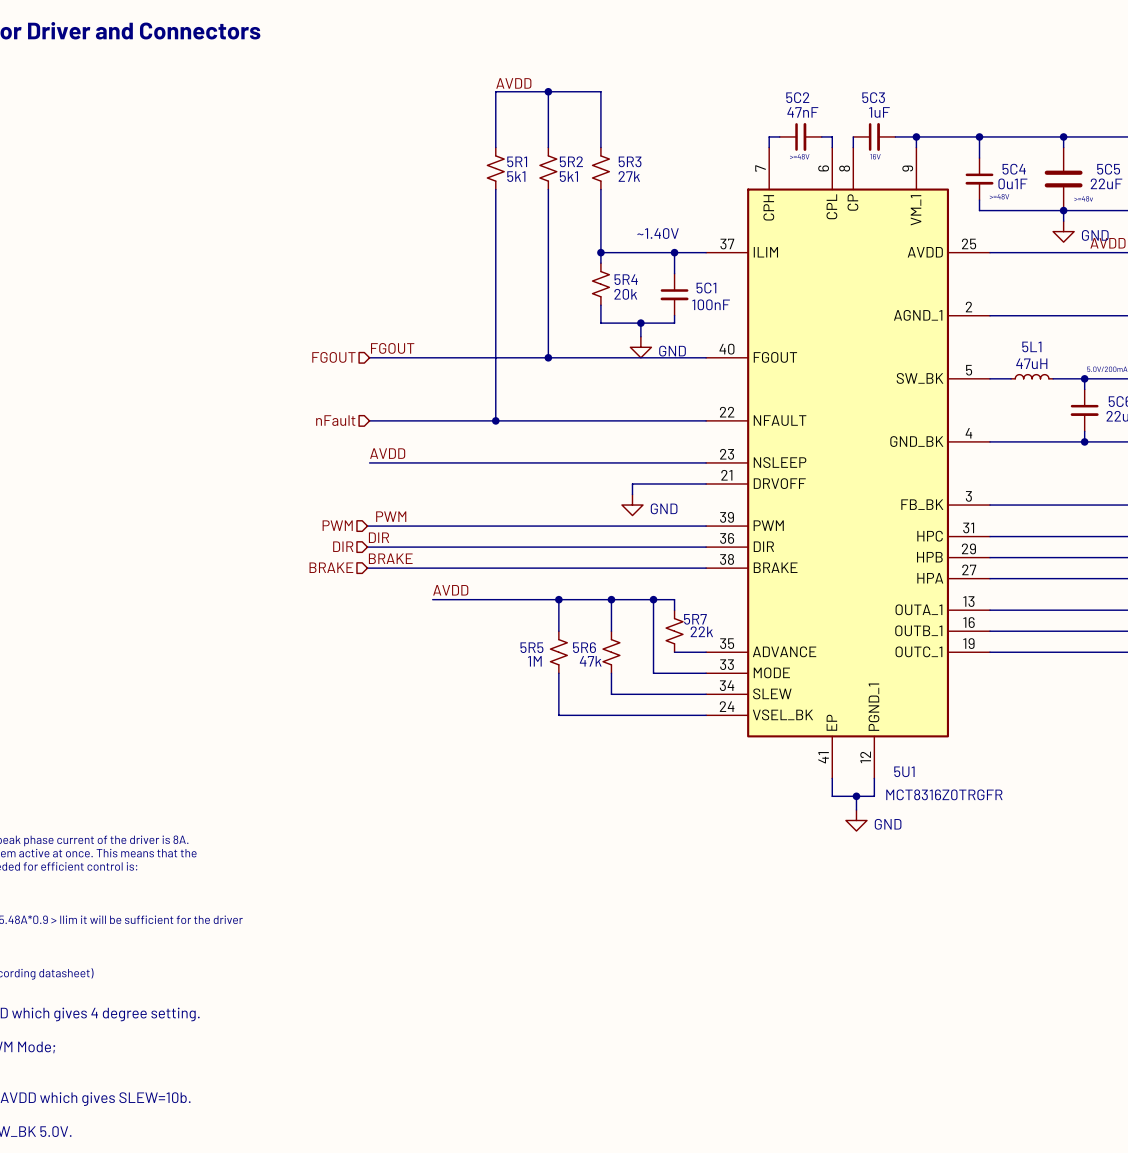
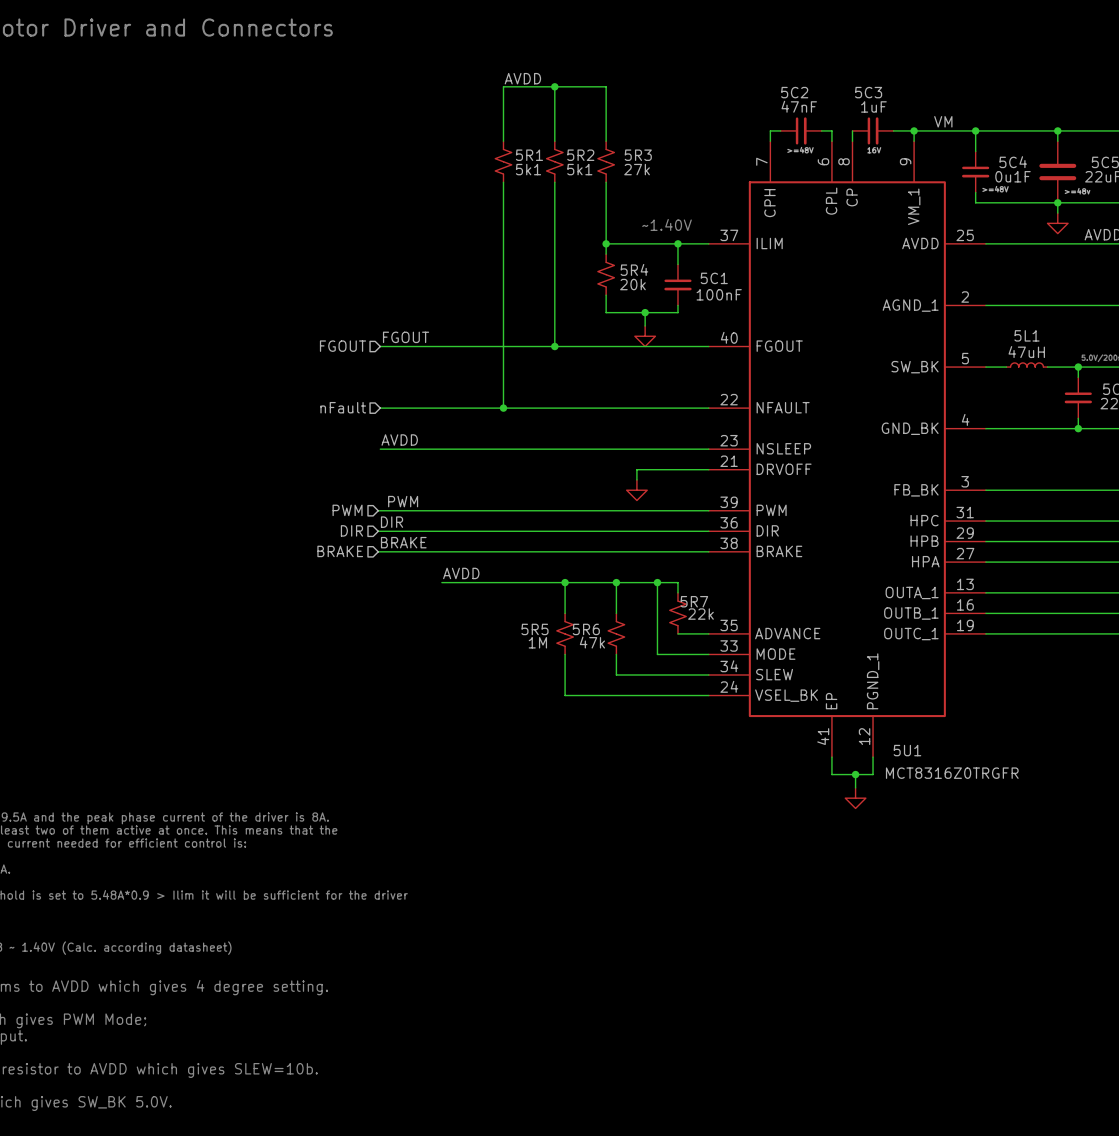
label: none -> VM (943, 121)
power symbol text: GND (1095, 235) -> none
power symbol text: GND (672, 351) -> none
power symbol text: GND (664, 508) -> none
power symbol text: GND (888, 824) -> none

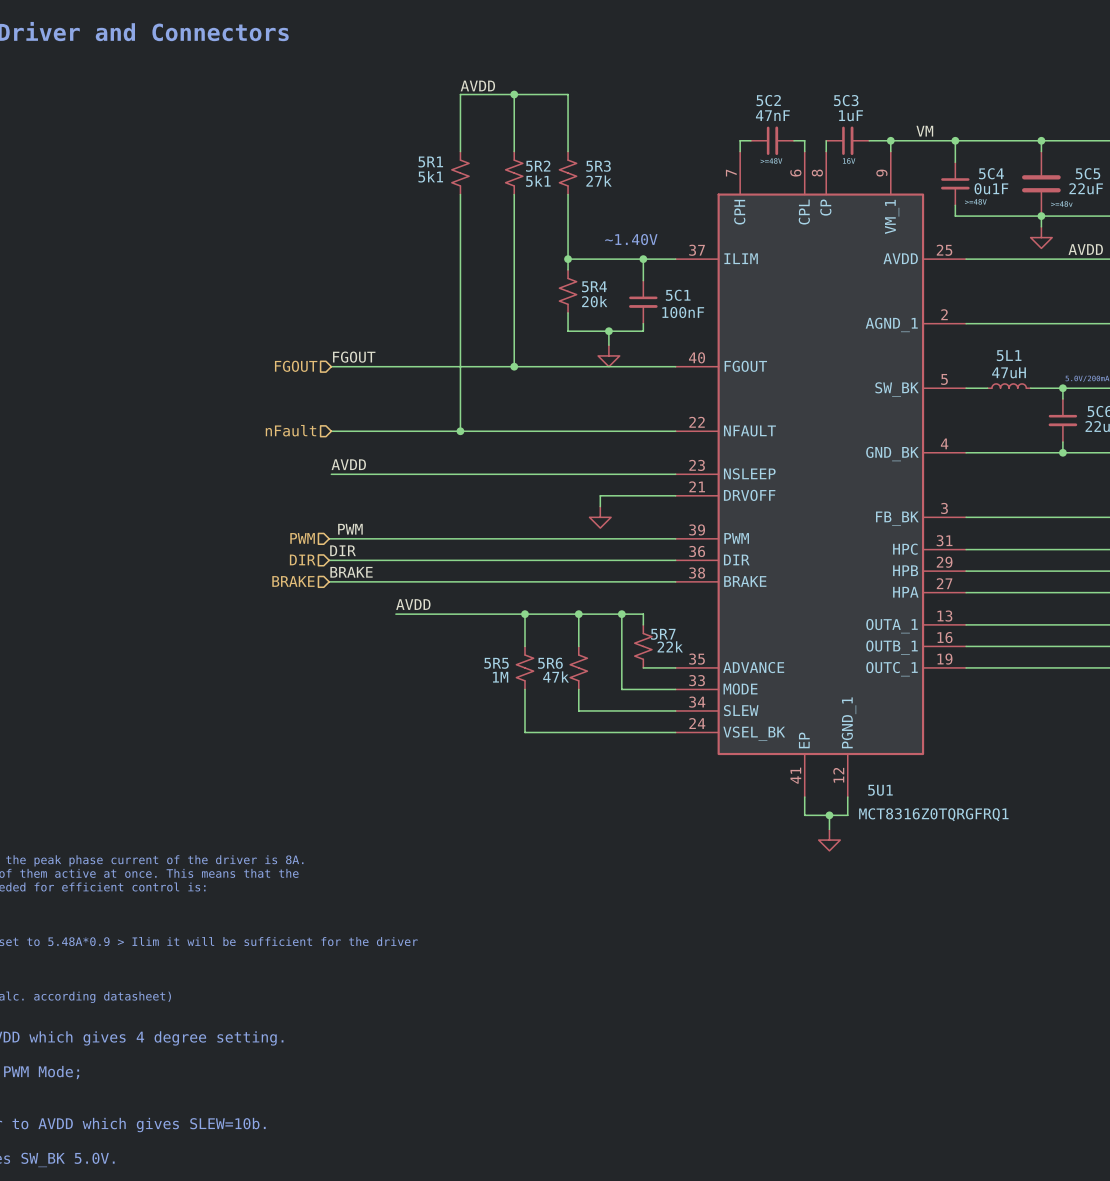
5R1 name position: 5R1 (529, 155) -> 5R1 (430, 162)
5R1 value position: 5k1 (528, 169) -> 5k1 (430, 176)
5U1 value: MCT8316Z0TRGFR (952, 773) -> MCT8316Z0TQRGFRQ1 (933, 814)

